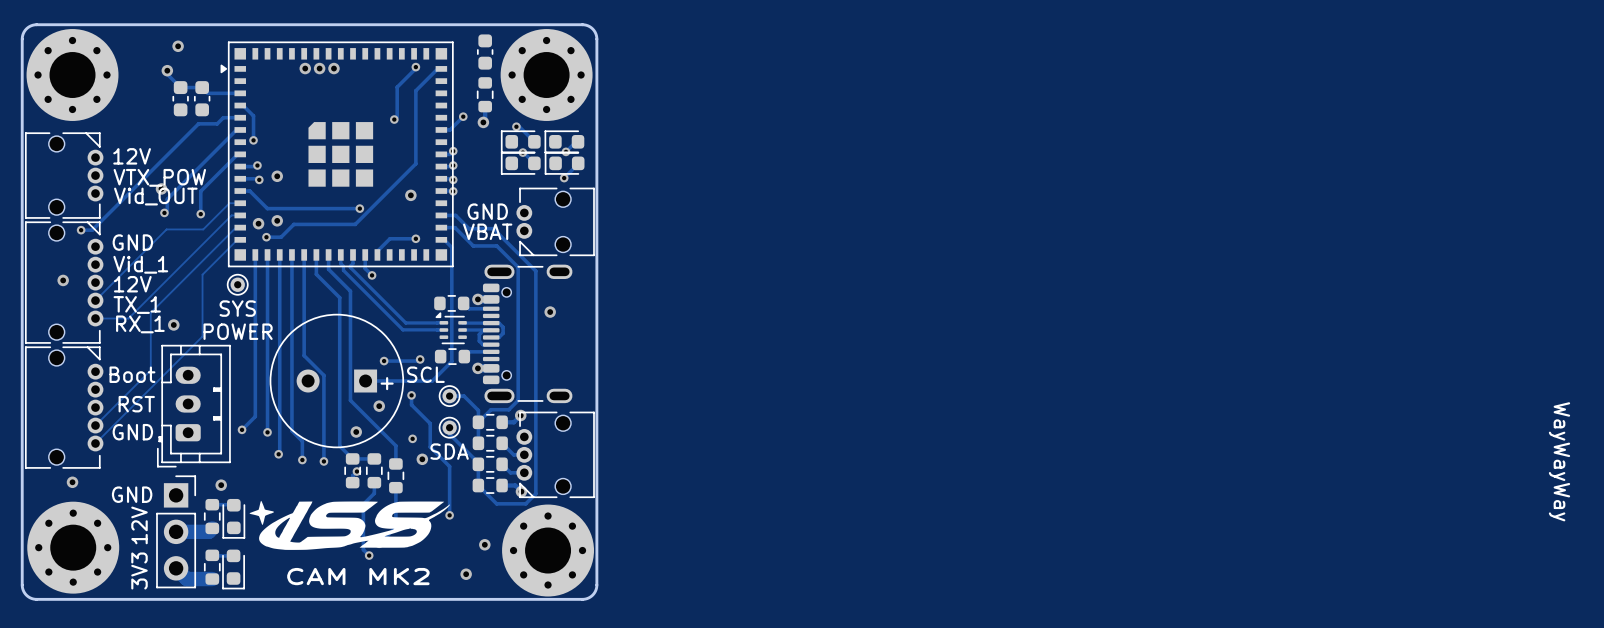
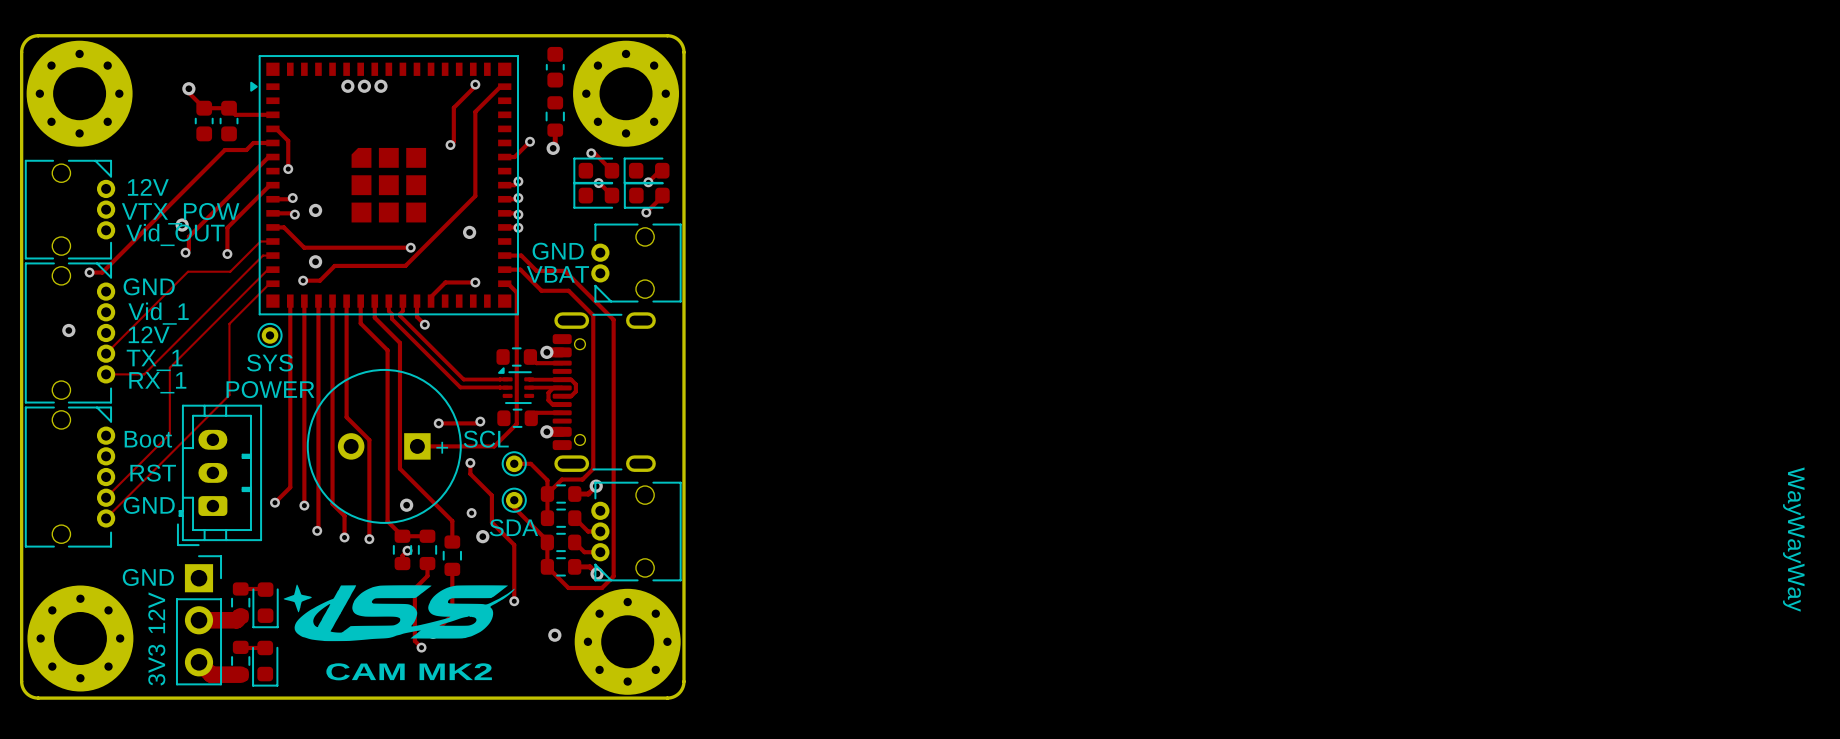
via: (178, 46) -> none
via: (258, 223) -> none
via: (550, 312) -> none
via: (173, 324) -> none
via: (379, 406) -> none
via: (72, 482) -> none
via: (221, 485) -> none
via: (466, 574) -> none

